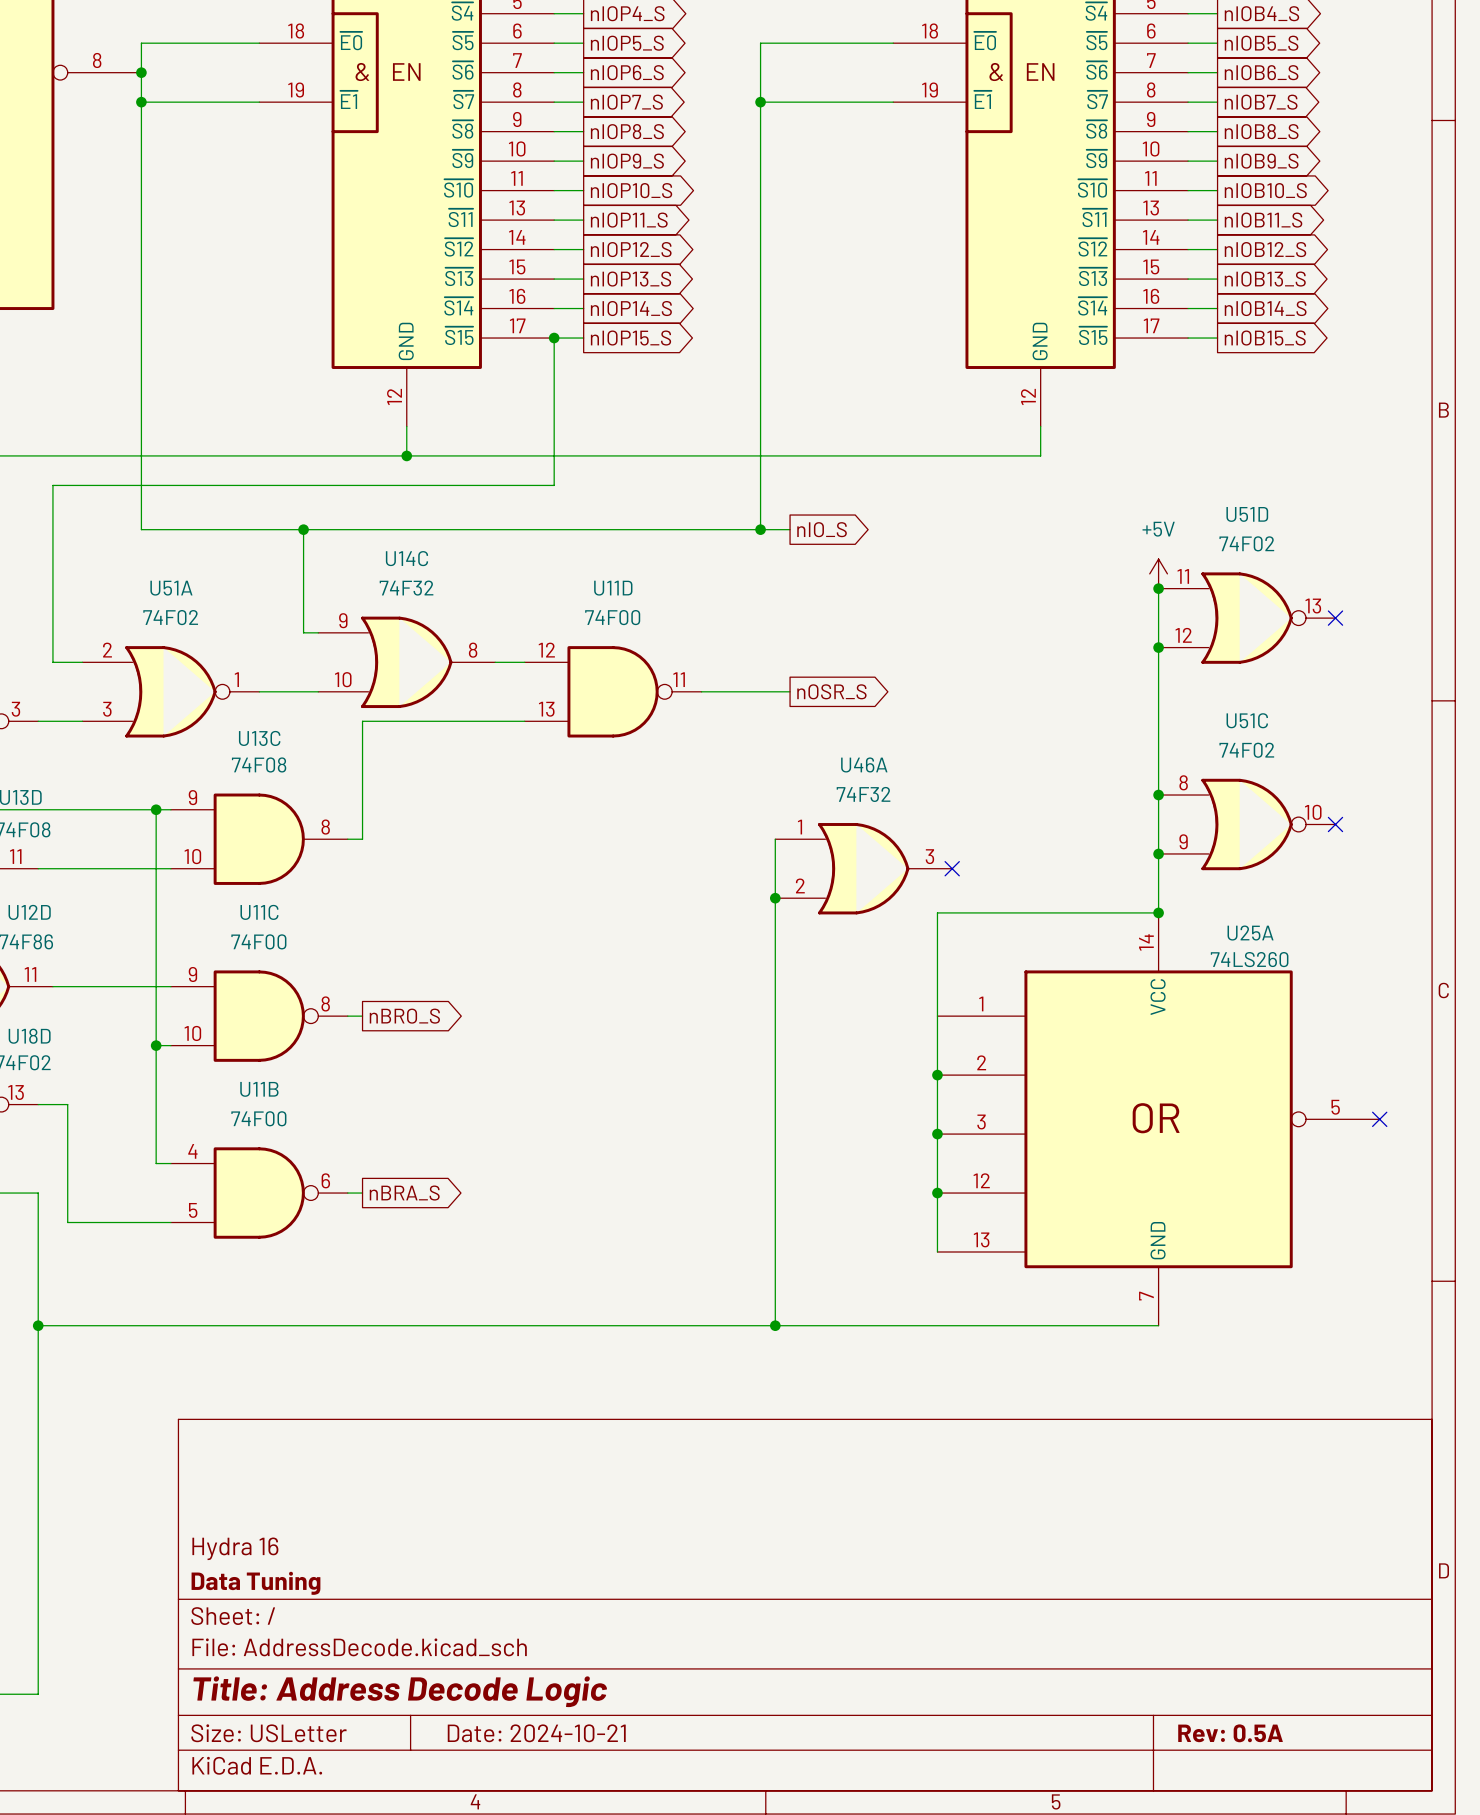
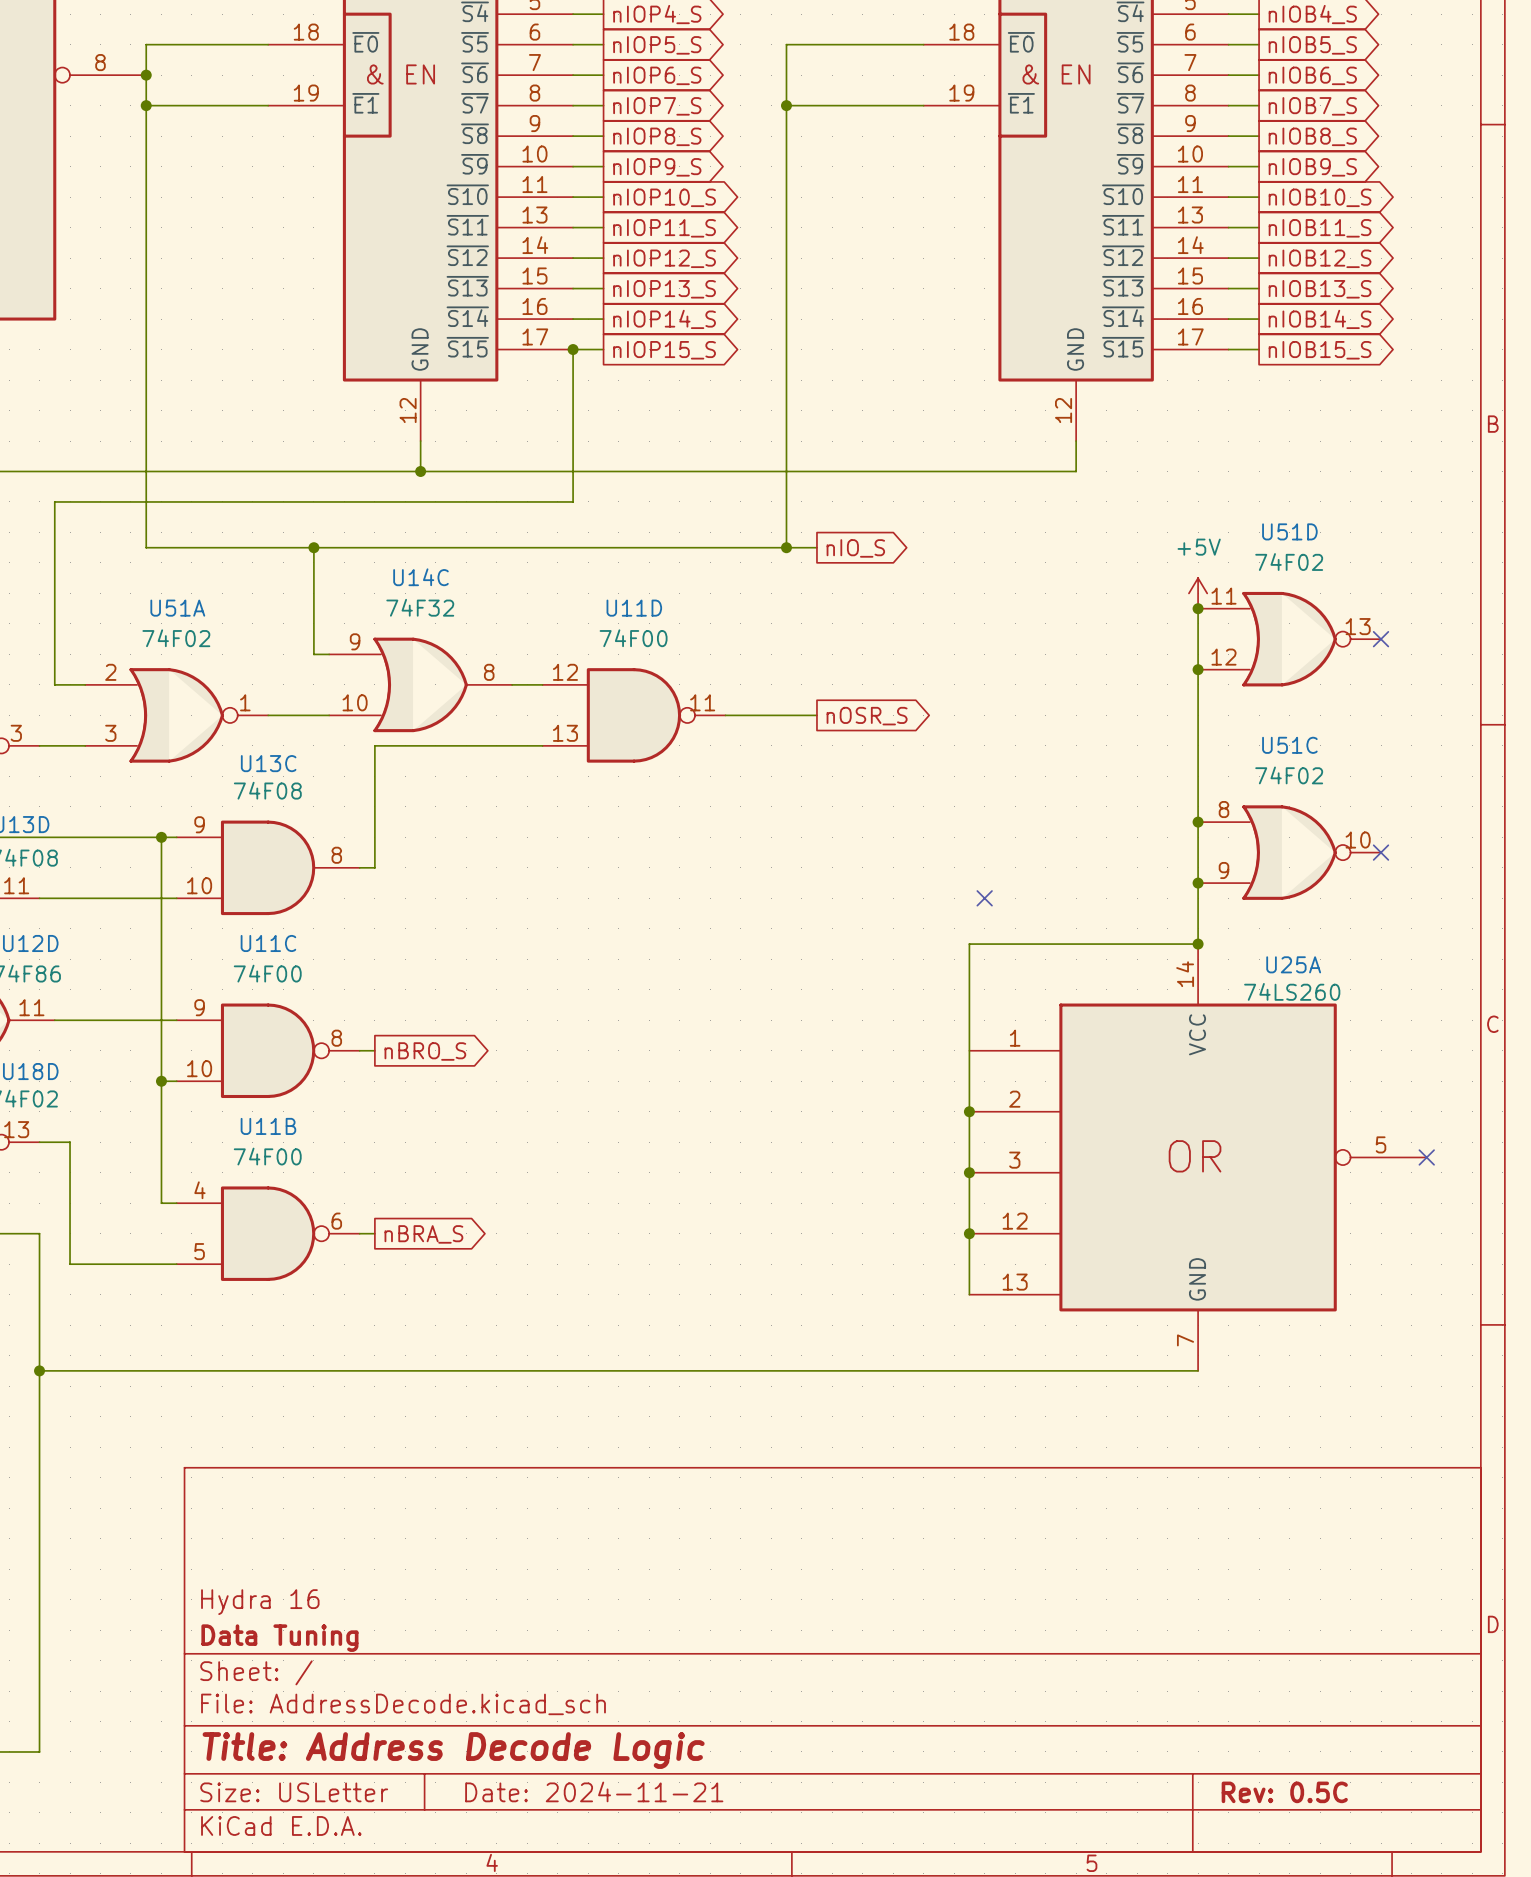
wire: (775, 839) (775, 1325) -> none
U46A: 74F32 (863, 868) -> none
junction: (775, 898) -> none
junction: (775, 1325) -> none
title block: Date: 2024-10-21 (536, 1733) -> Date: 2024-11-21 (594, 1791)
title block: Rev: 0.5A (1230, 1733) -> Rev: 0.5C (1284, 1792)

